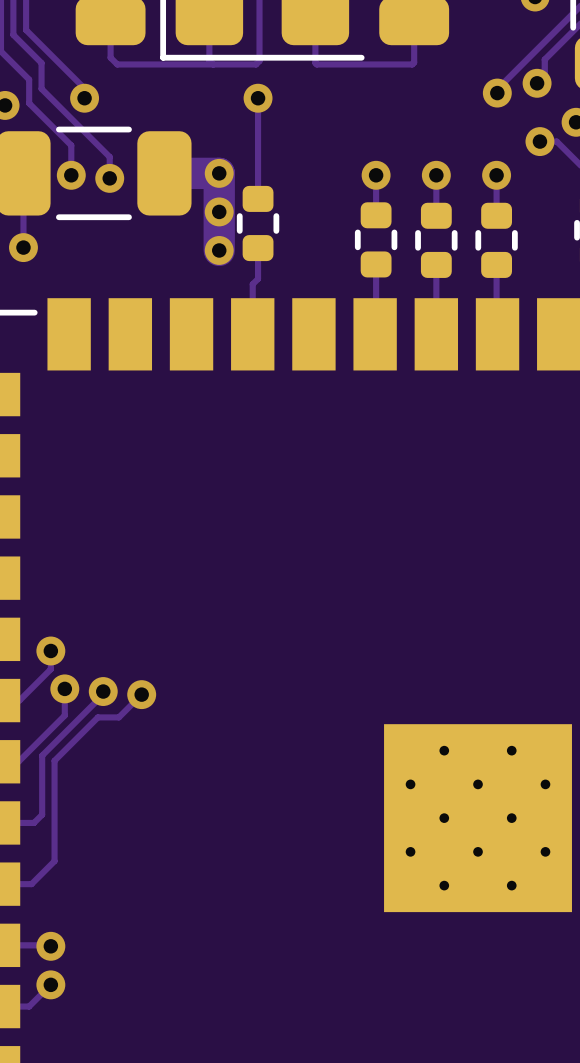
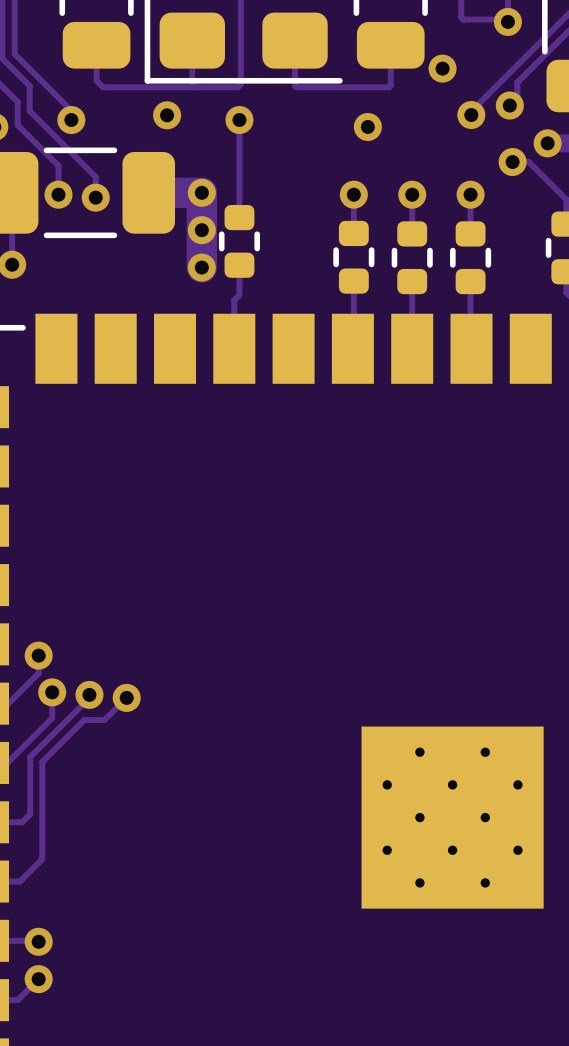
via: none -> (442, 68)
via: none -> (167, 115)
via: none -> (367, 126)

